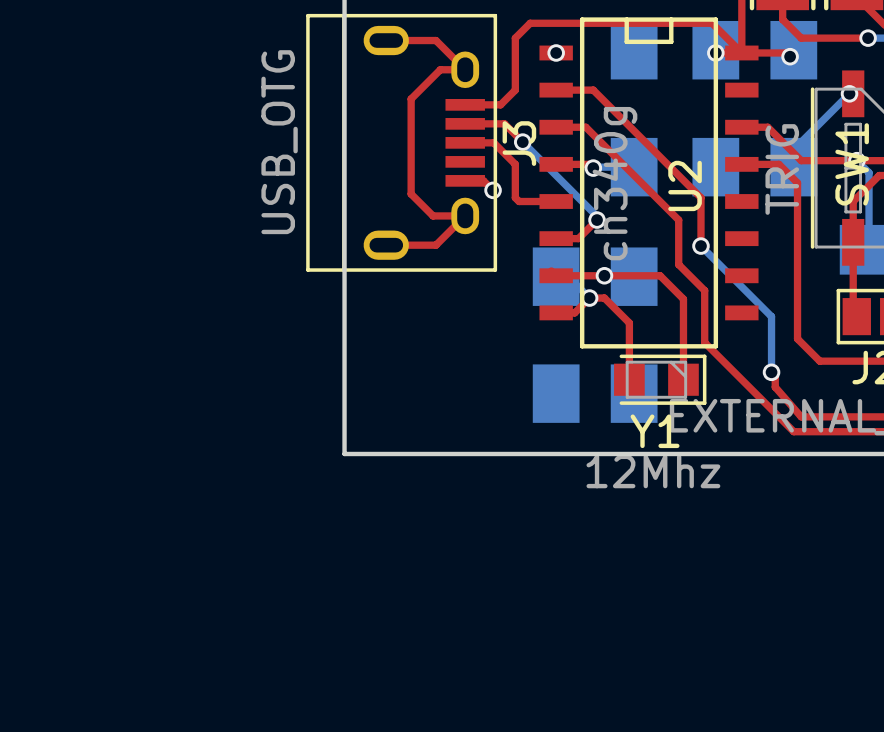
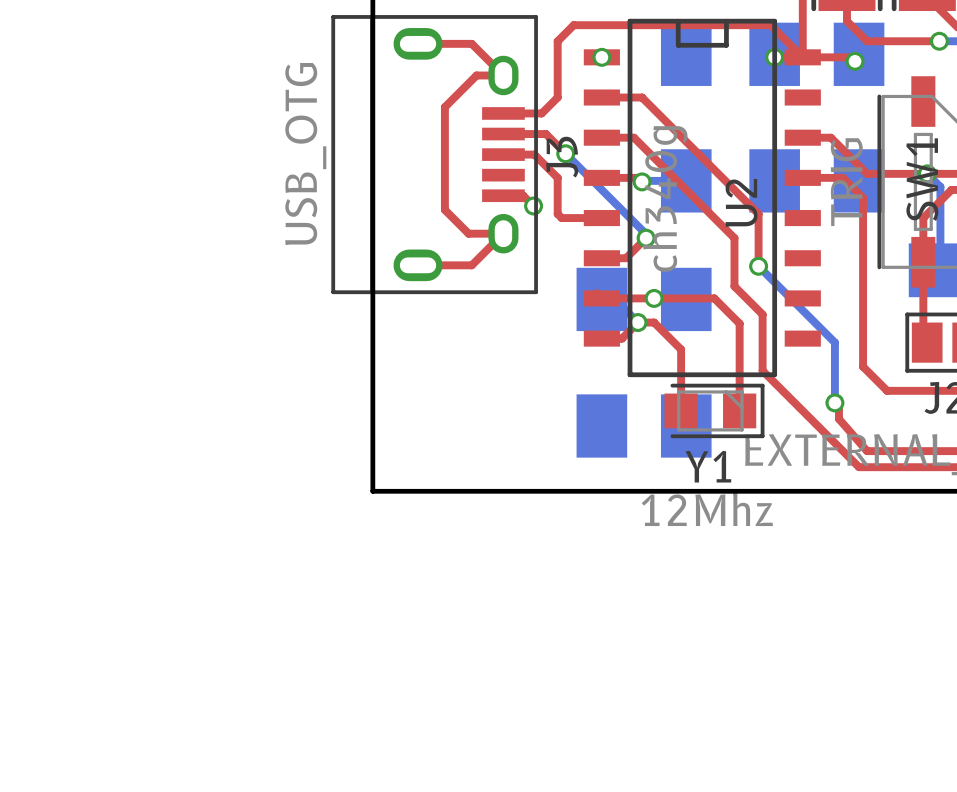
bottom track: (849, 93) (793, 149) (793, 167) -> none
via: (849, 93) -> none

